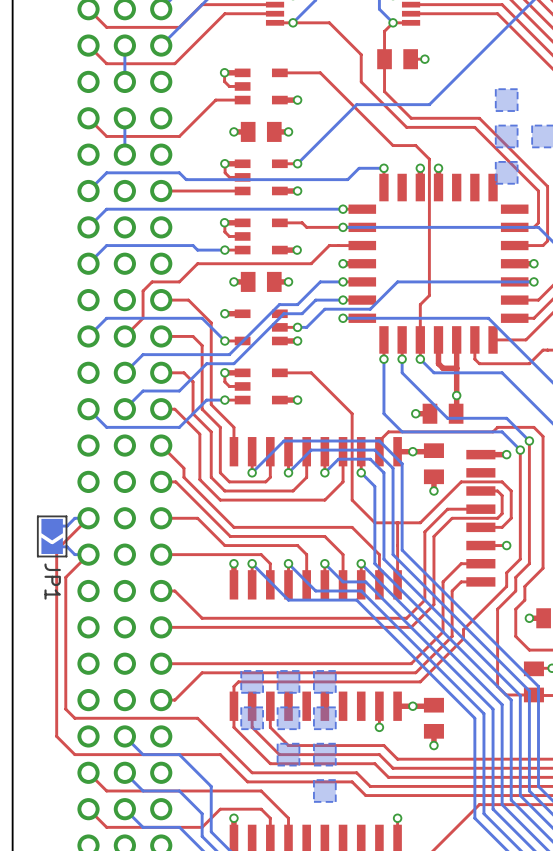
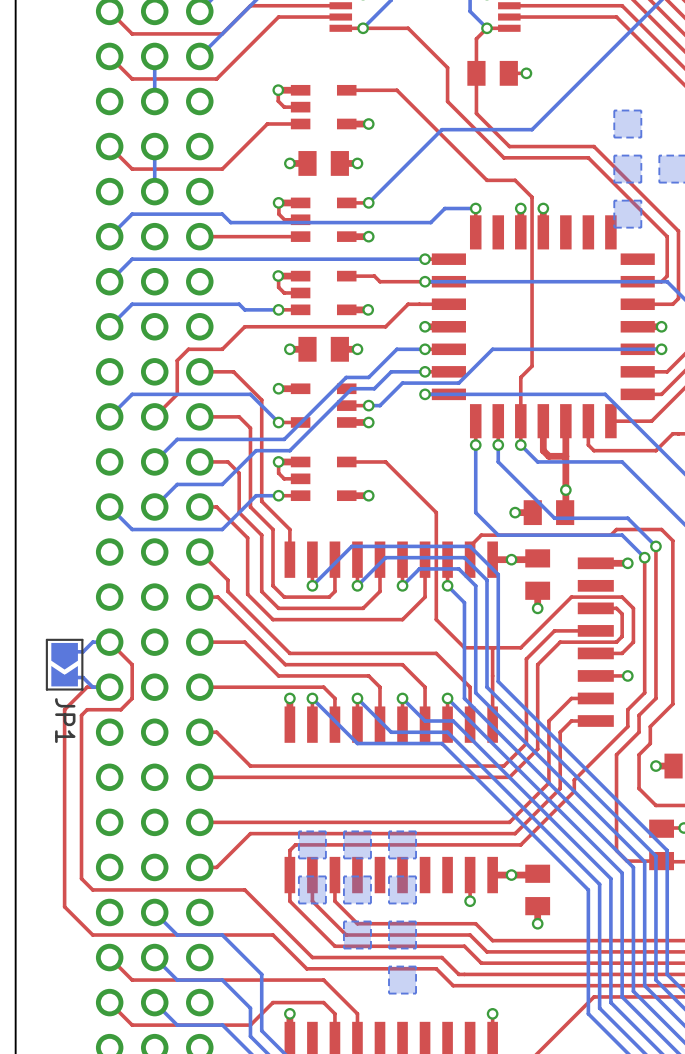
top track: (88, 518) (56, 550) (56, 736) -> (109, 687) (87, 687) (64, 709) (64, 906) (70, 912)
top track: (88, 554) (70, 572) -> (109, 642) (132, 664) (132, 698) (120, 709) (87, 709)

